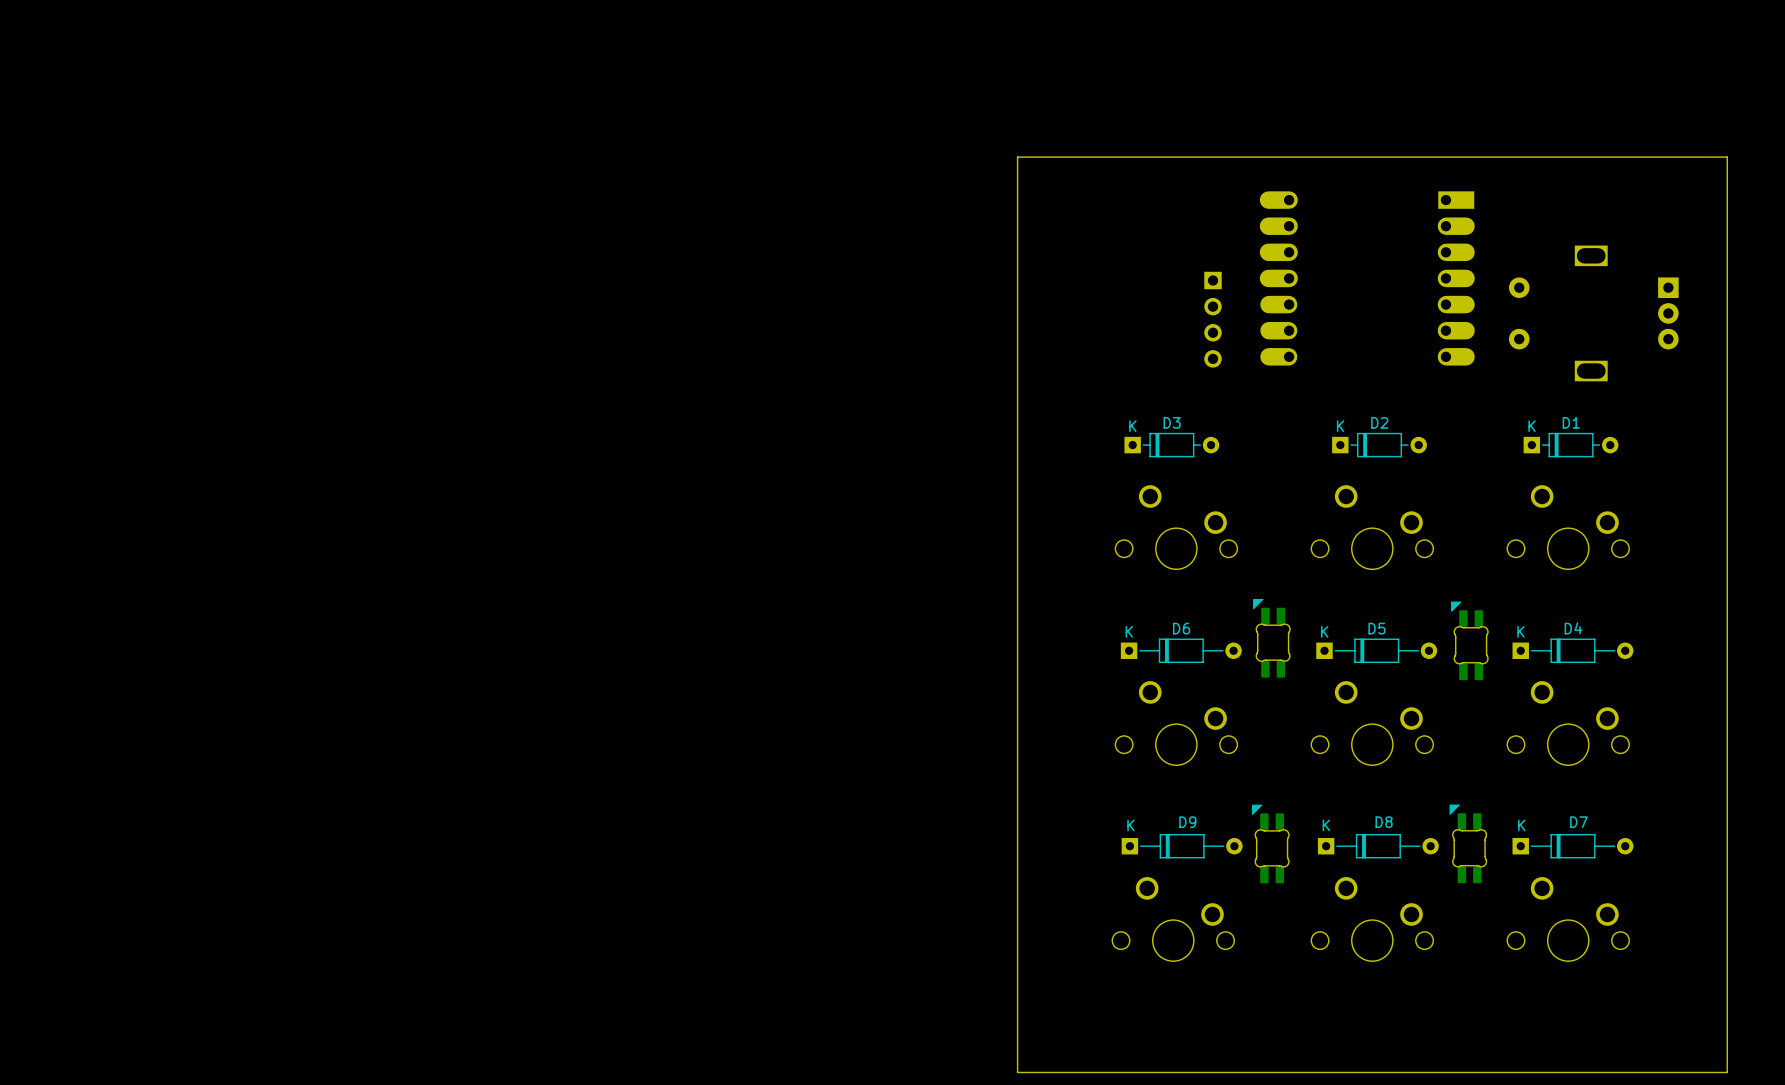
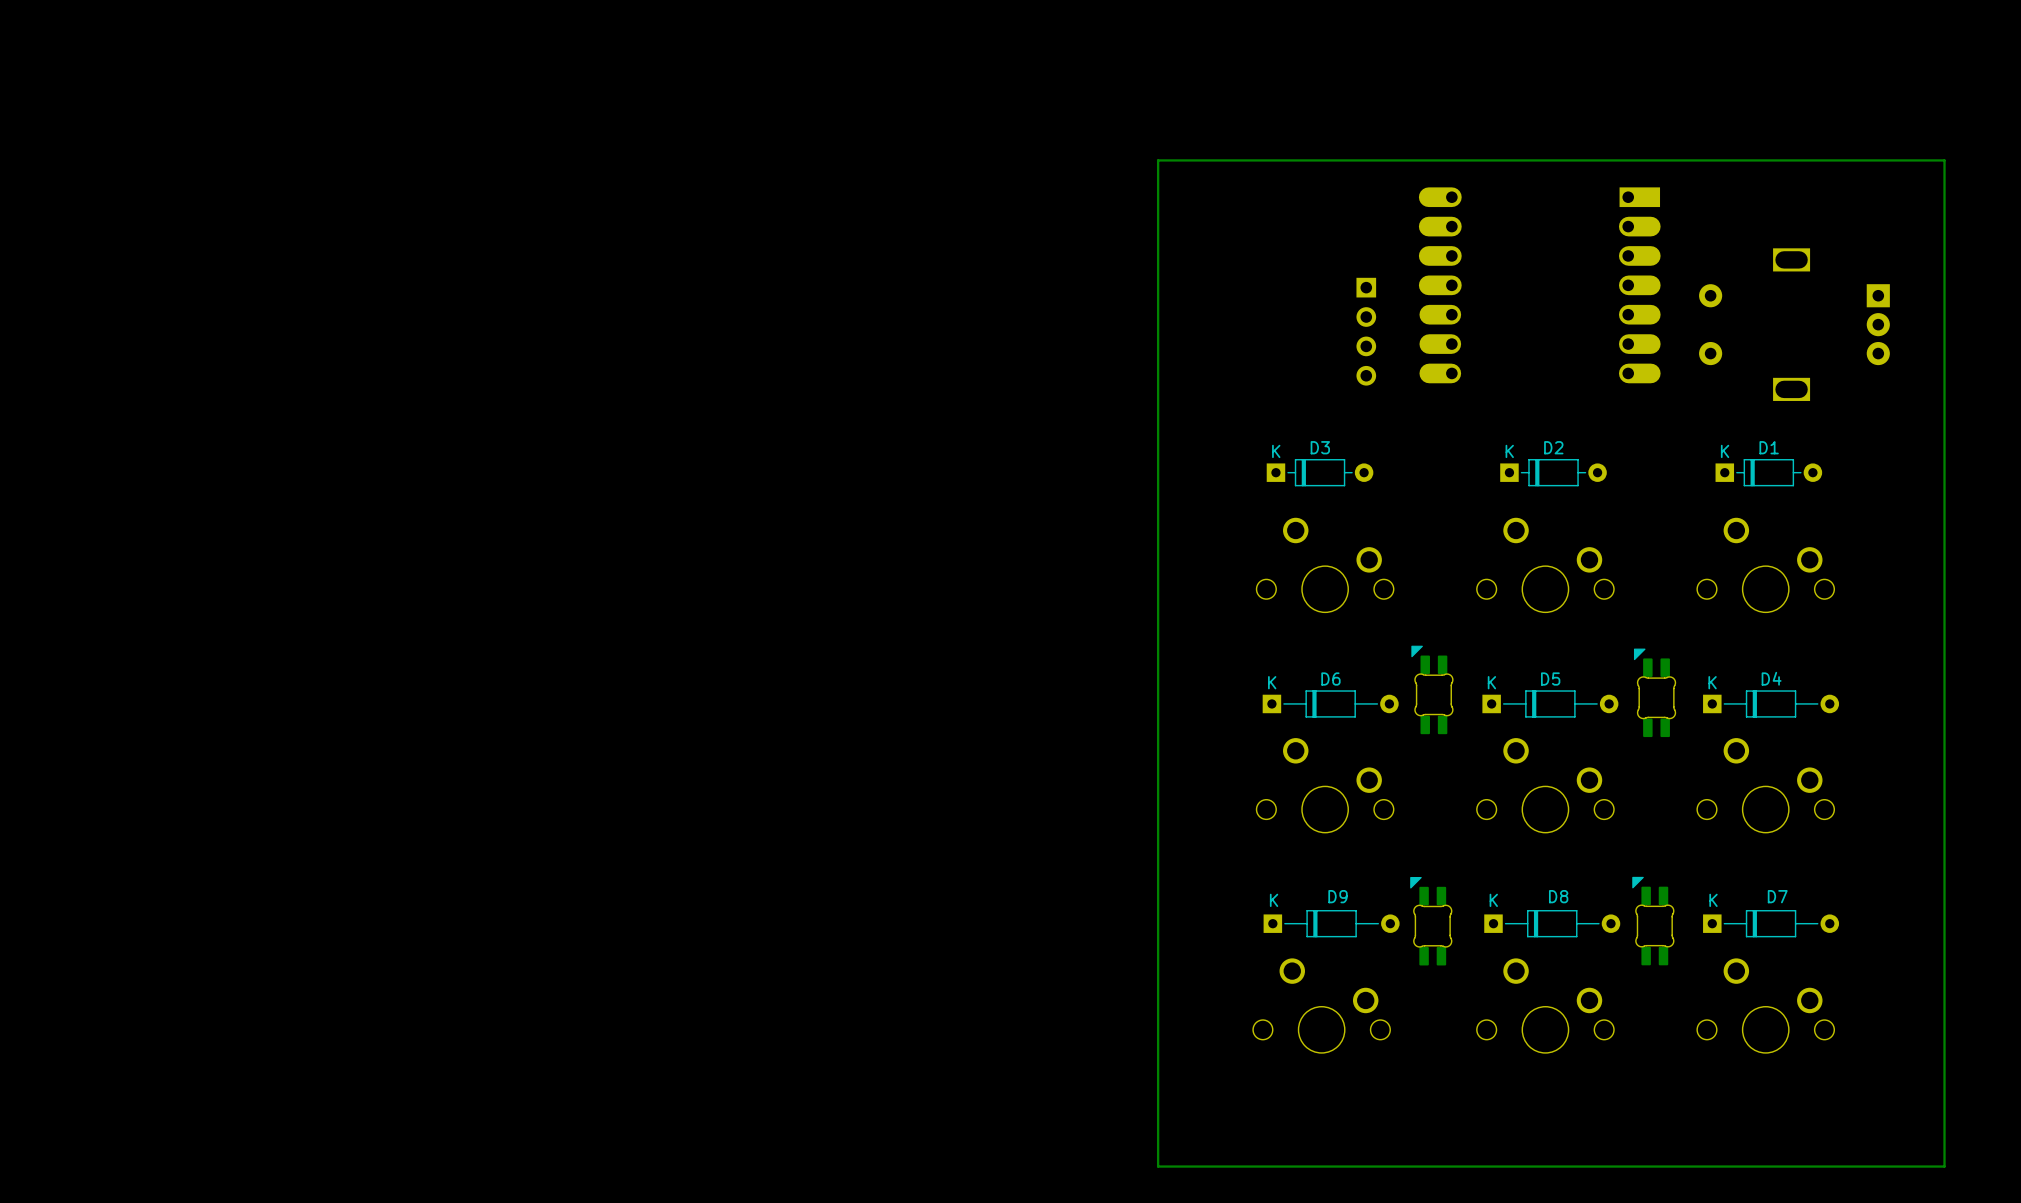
board edge: (1727, 157) (1017, 157) (1017, 1072) (1727, 1072) (1727, 157) -> none
track: none -> (1944, 160) (1158, 160) (1158, 1166) (1944, 1166) (1944, 160)

